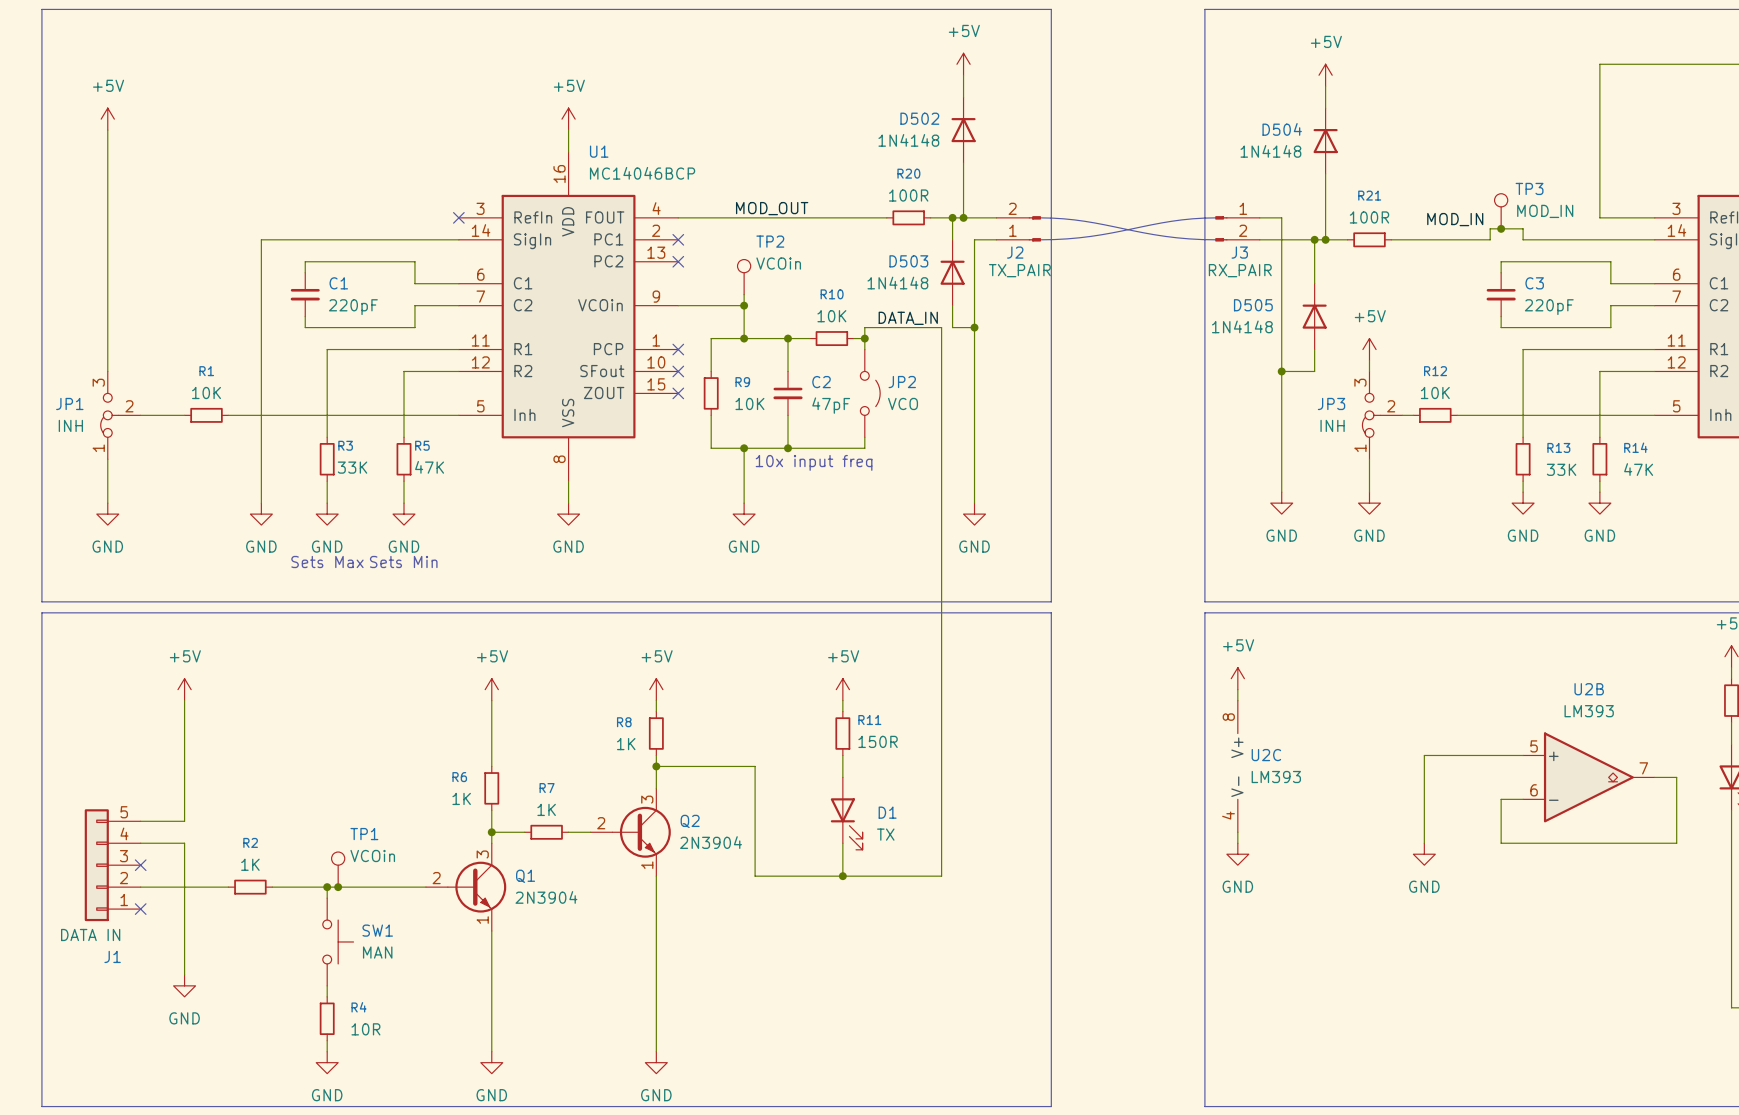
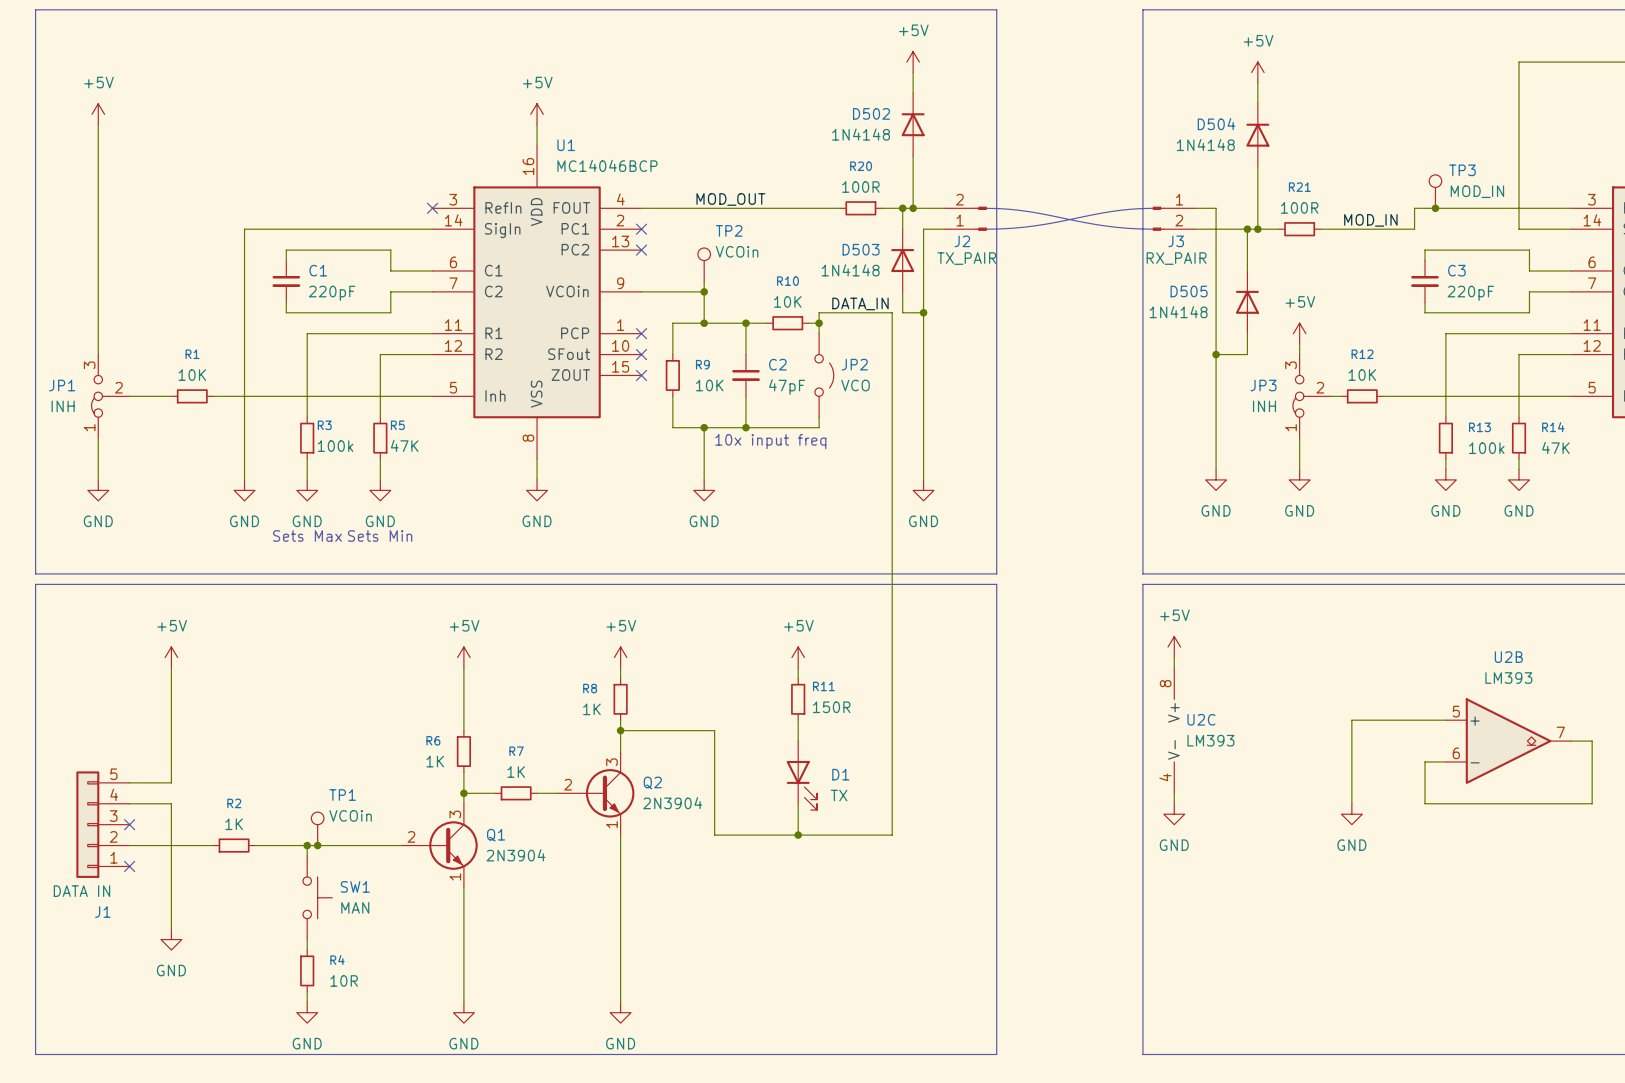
TP3 position: (1501, 211) -> (1435, 191)
label position: MOD_IN (1455, 219) -> MOD_IN (1370, 220)
wire: (1490, 228) (1523, 228) (1523, 239) (1599, 239) -> (1414, 218) (1414, 208) (1519, 208) (1519, 229)
junction position: (1501, 228) -> (1435, 208)
R3 value: 33K (352, 467) -> 100k (335, 446)
R13 value: 33K (1561, 469) -> 100k (1486, 448)

